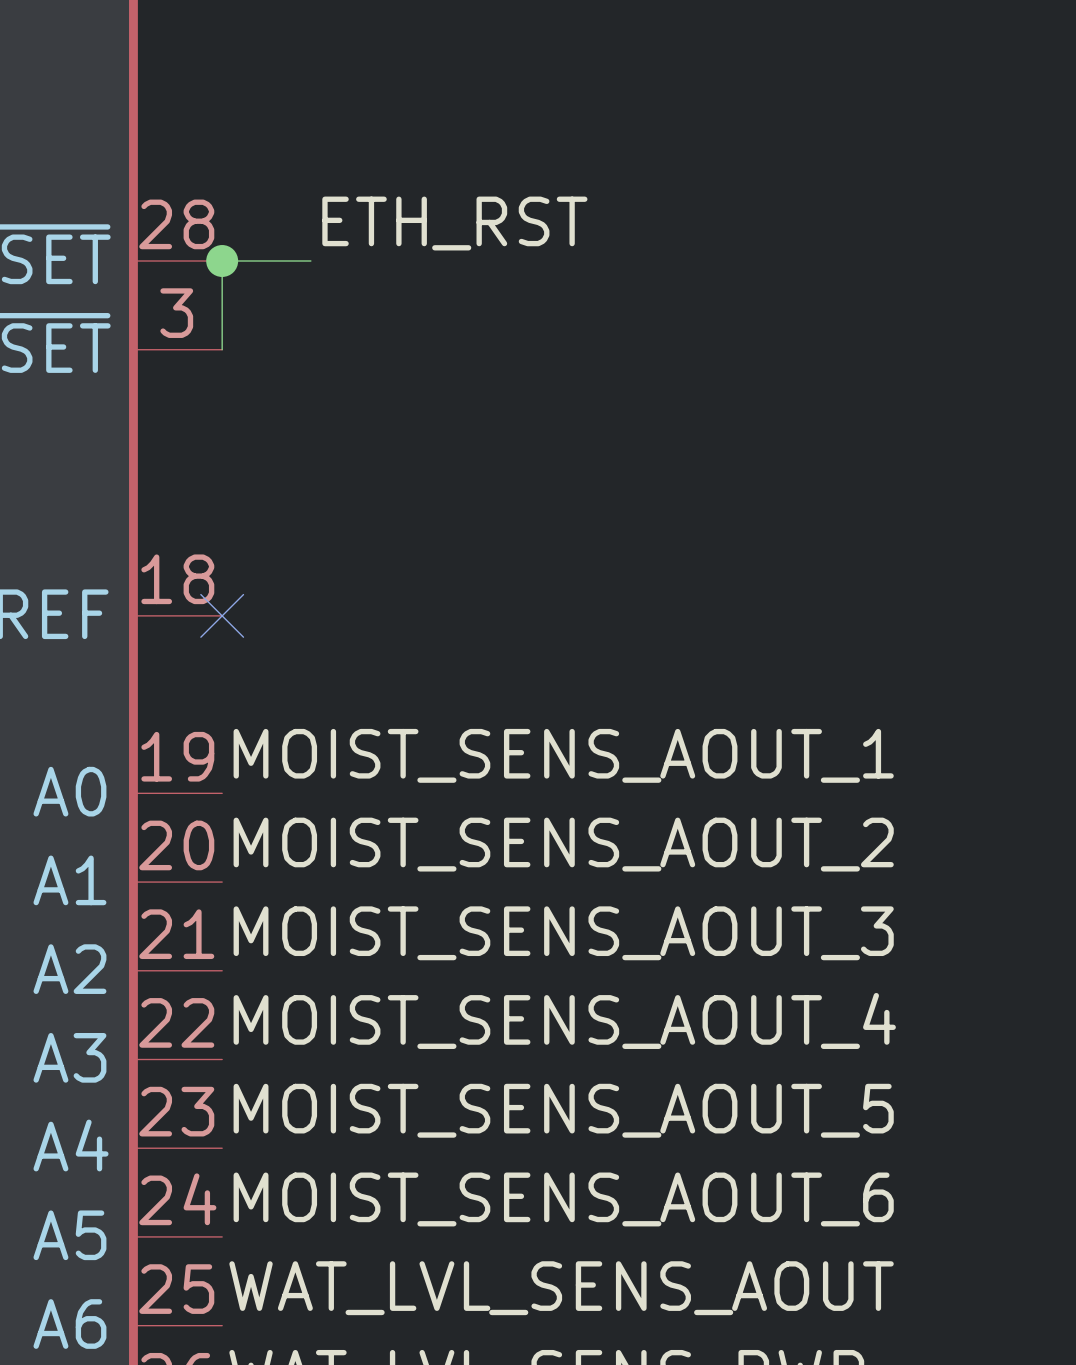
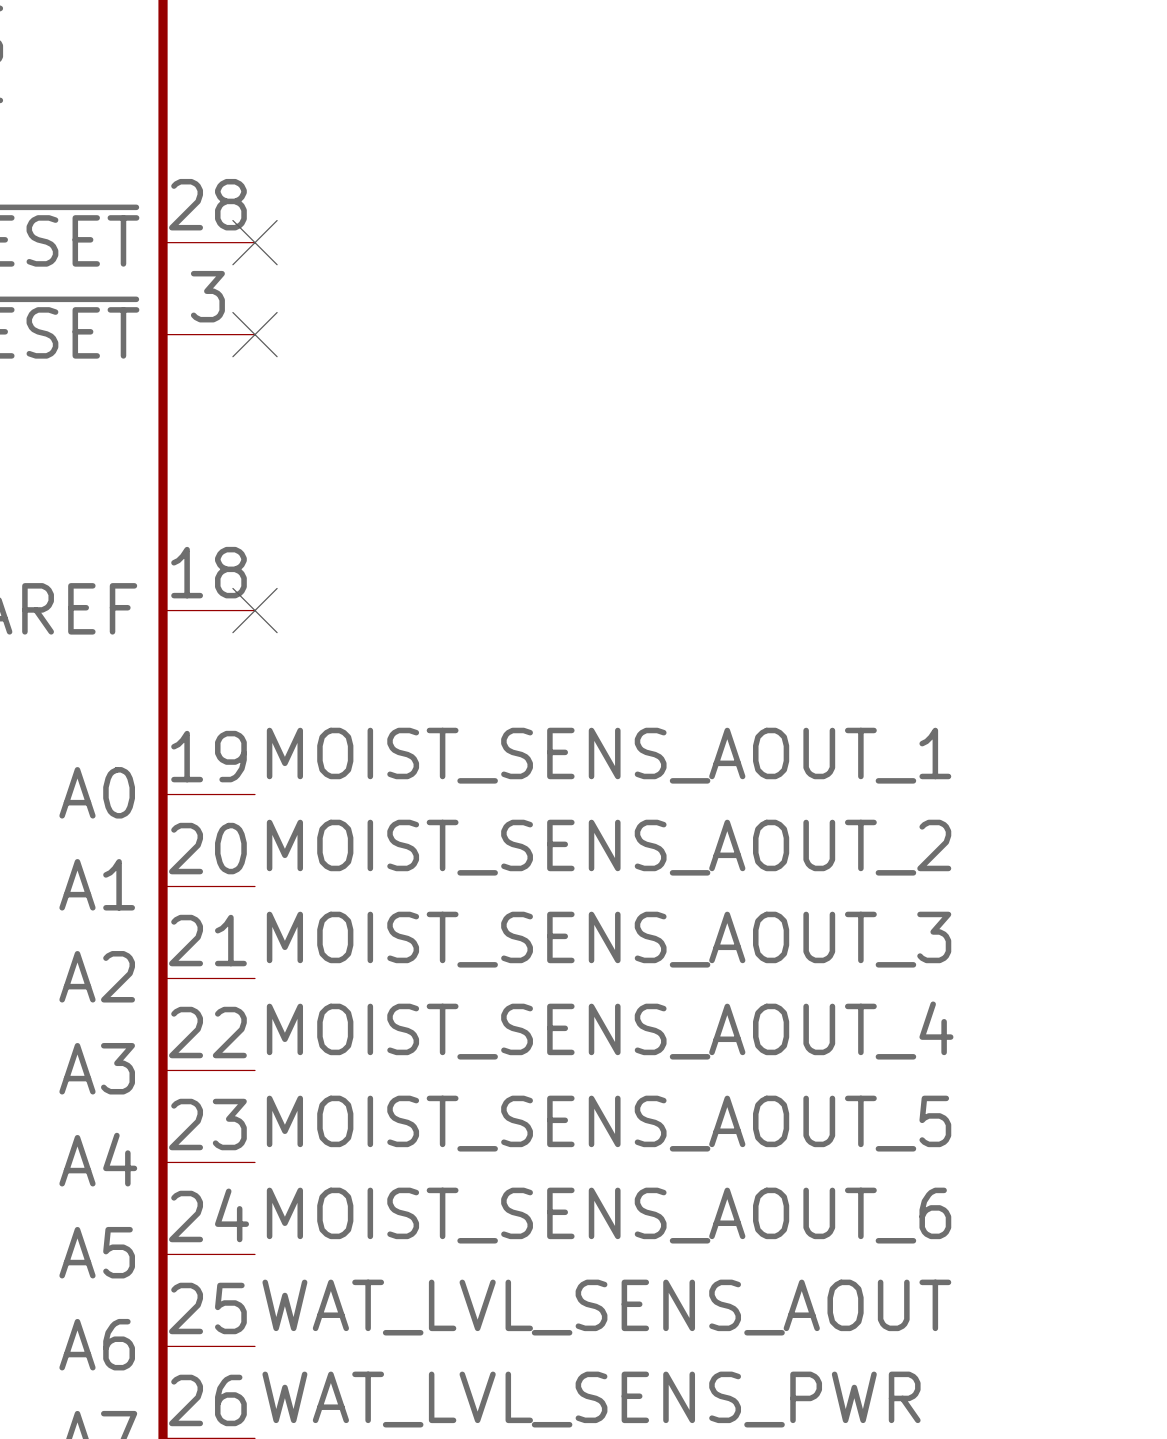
label: ETH_RST (454, 223) -> none
junction: (222, 260) -> none
no-connect mark: none -> (255, 242)
wire: (310, 260) (222, 260) (222, 349) -> none
no-connect mark: none -> (255, 334)

